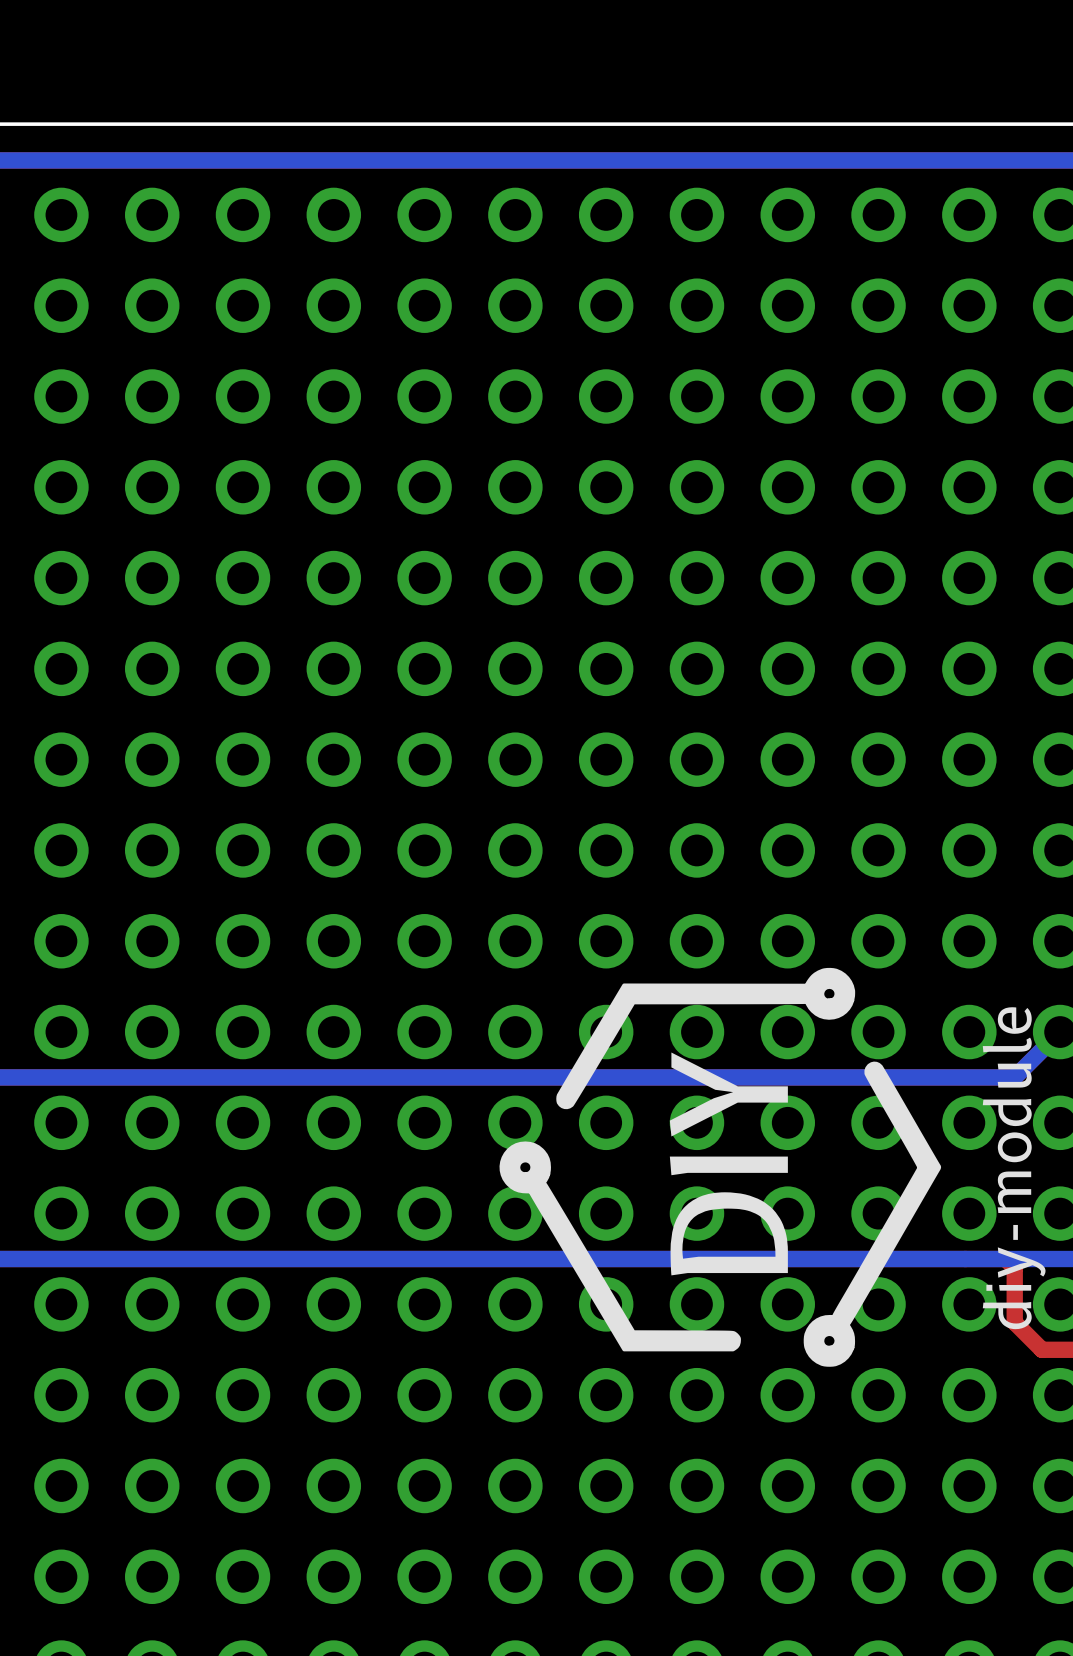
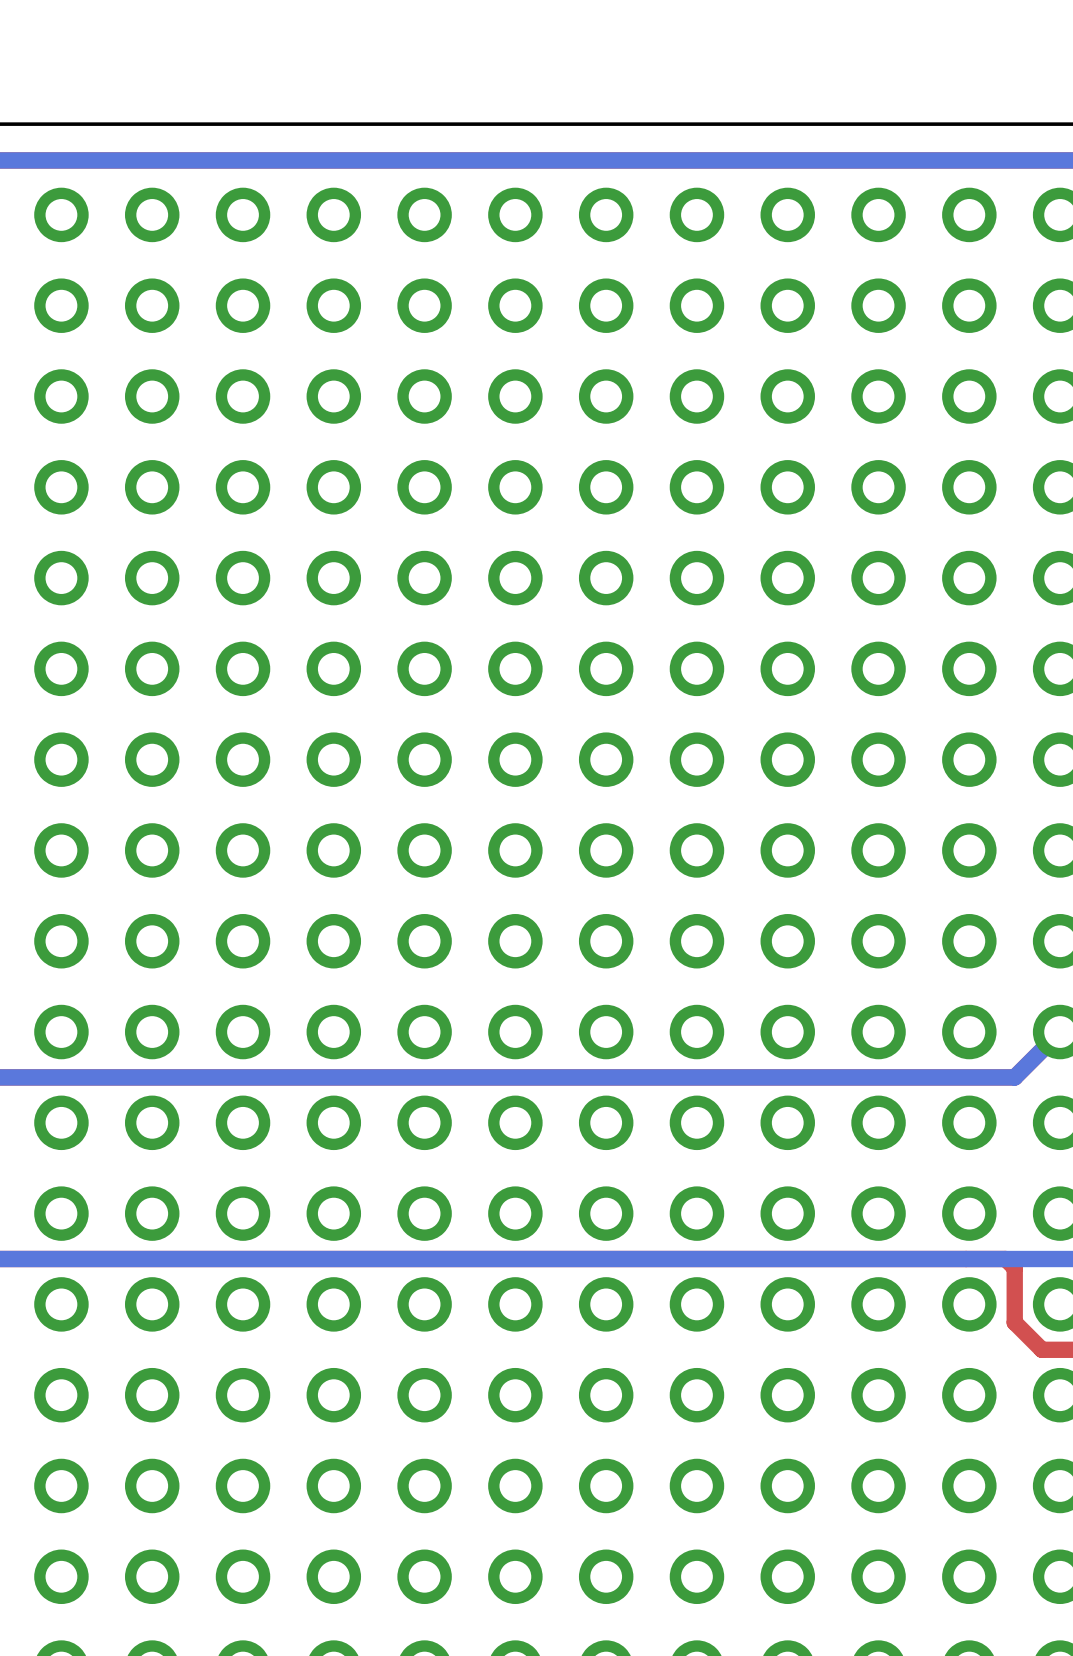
drawing: [499, 967, 942, 1367] -> none
text: DIY (728, 1163) -> none
text: diy-module (1014, 1168) -> none

